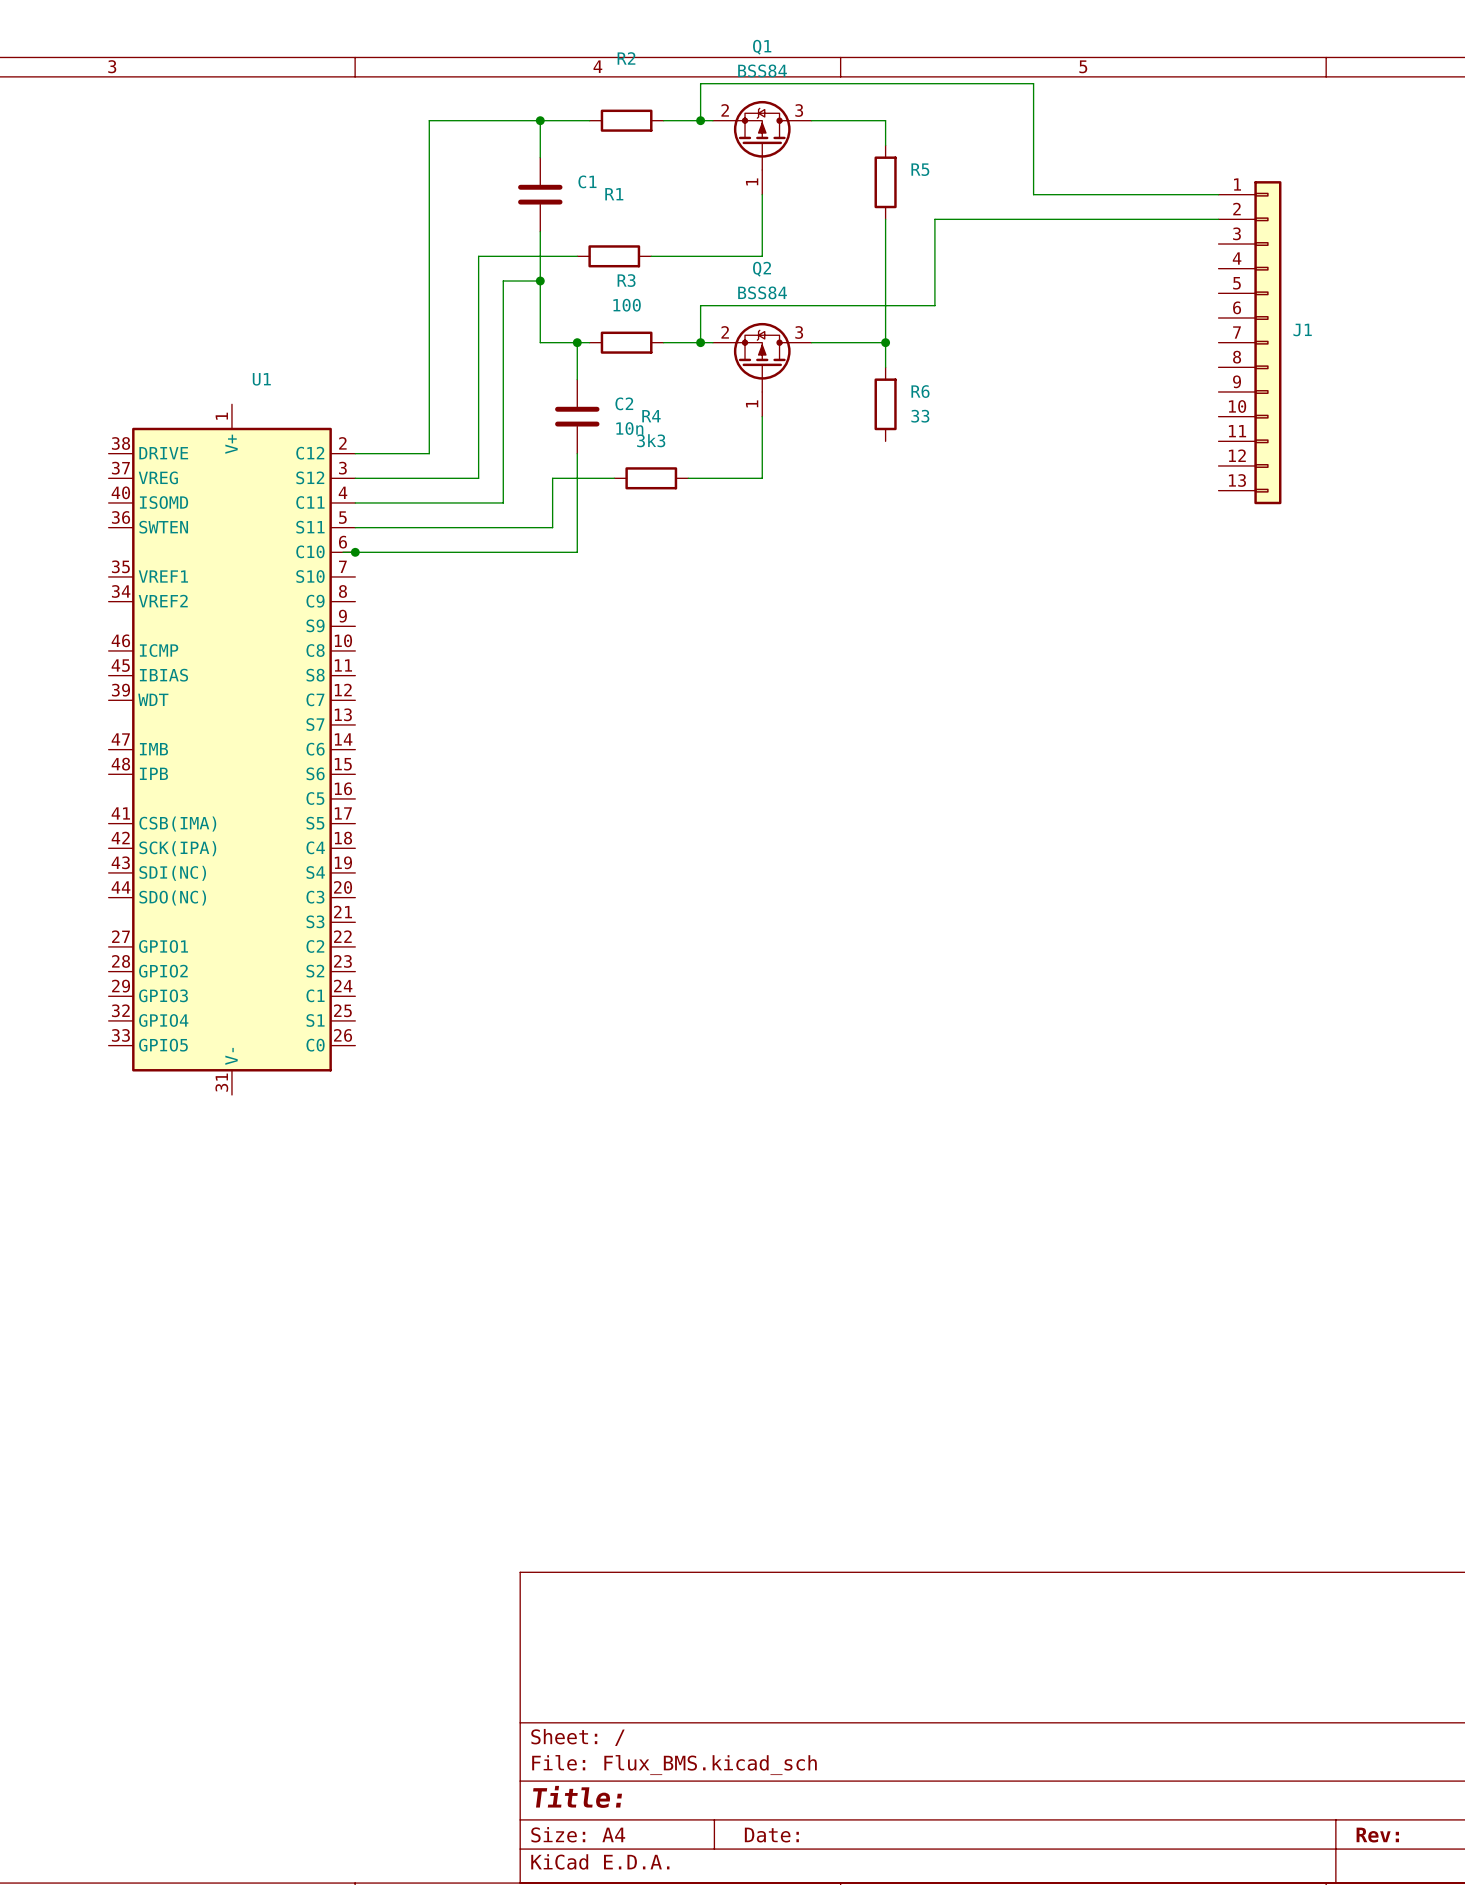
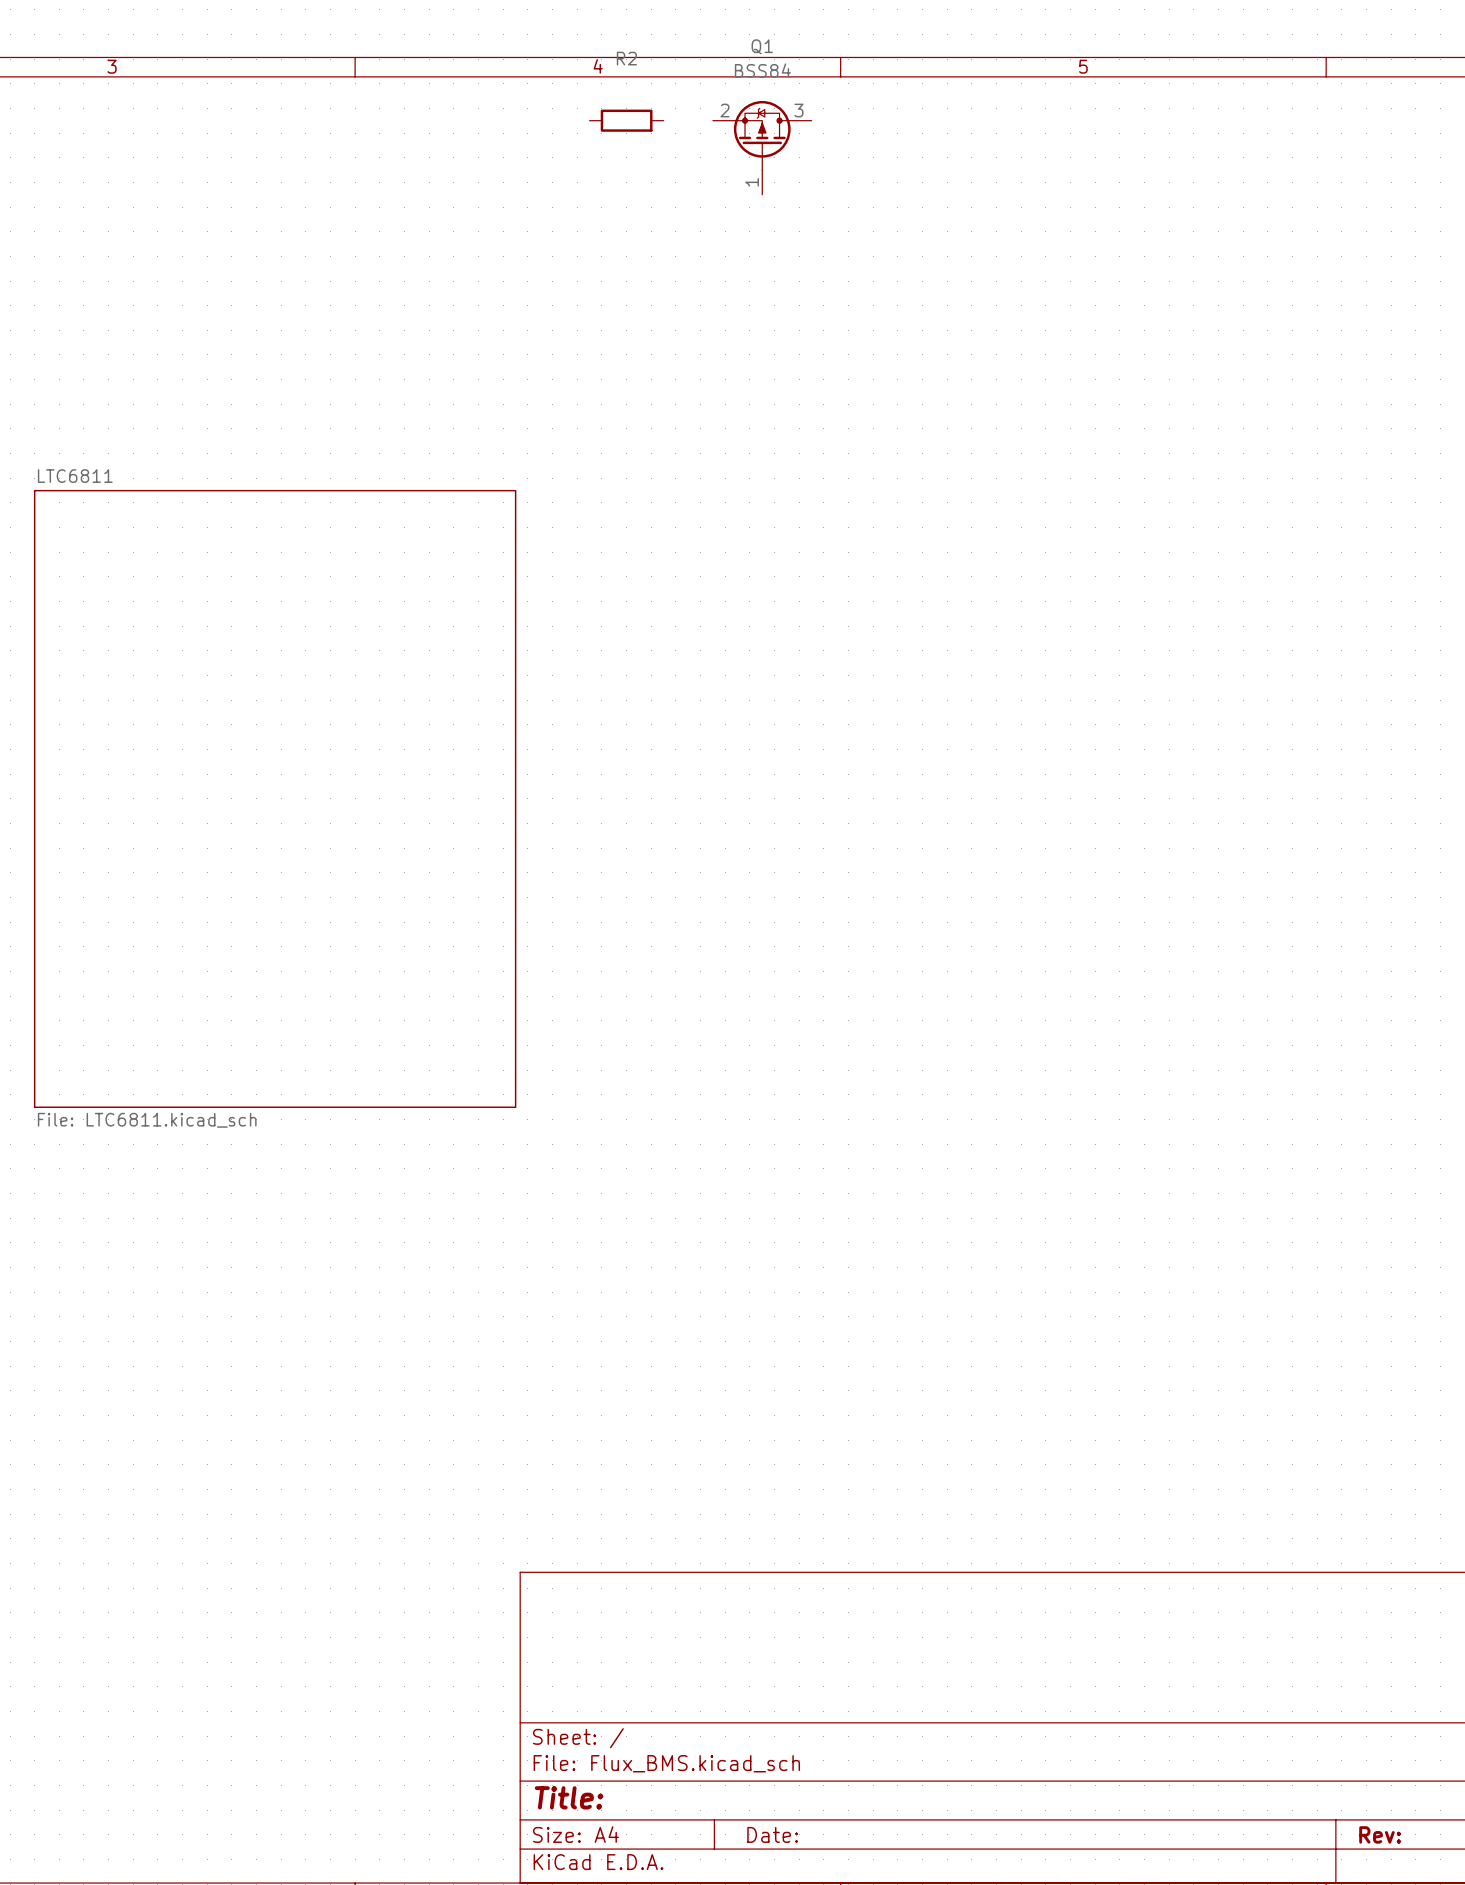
wire: (540, 120) (540, 157) -> none
junction: (540, 120) -> none
wire: (589, 120) (429, 120) (429, 453) (355, 453) -> none
wire: (663, 120) (712, 120) -> none
wire: (700, 120) (700, 83) (1033, 83) (1033, 194) (1218, 194) -> none
junction: (700, 120) -> none
wire: (811, 120) (885, 120) (885, 145) -> none
R5: (885, 182) -> none
C1: (540, 194) -> none
wire: (762, 194) (762, 256) (651, 256) -> none
wire: (885, 219) (885, 367) -> none
wire: (1218, 219) (934, 219) (934, 305) (700, 305) (700, 342) -> none
wire: (540, 231) (540, 342) (589, 342) -> none
wire: (577, 256) (478, 256) (478, 478) (355, 478) -> none
R1: (614, 256) -> none
wire: (540, 281) (503, 281) (503, 502) (355, 502) -> none
junction: (540, 281) -> none
wire: (577, 342) (577, 379) -> none
junction: (577, 342) -> none
R3: 100 (626, 342) -> none
wire: (663, 342) (712, 342) -> none
junction: (700, 342) -> none
wire: (811, 342) (885, 342) -> none
junction: (885, 342) -> none
J1: (1250, 342) -> none
Q2: BSS84 (762, 369) -> none
R6: 33 (885, 404) -> none
C2: 10n (577, 416) -> none
wire: (762, 416) (762, 478) (688, 478) -> none
wire: (577, 453) (577, 552) (342, 552) -> none
wire: (614, 478) (552, 478) (552, 527) (355, 527) -> none
R4: 3k3 (651, 478) -> none
junction: (355, 552) -> none
U1: (231, 749) -> none
sheet LTC6811: none -> File: LTC6811.kicad_sch (275, 798)

